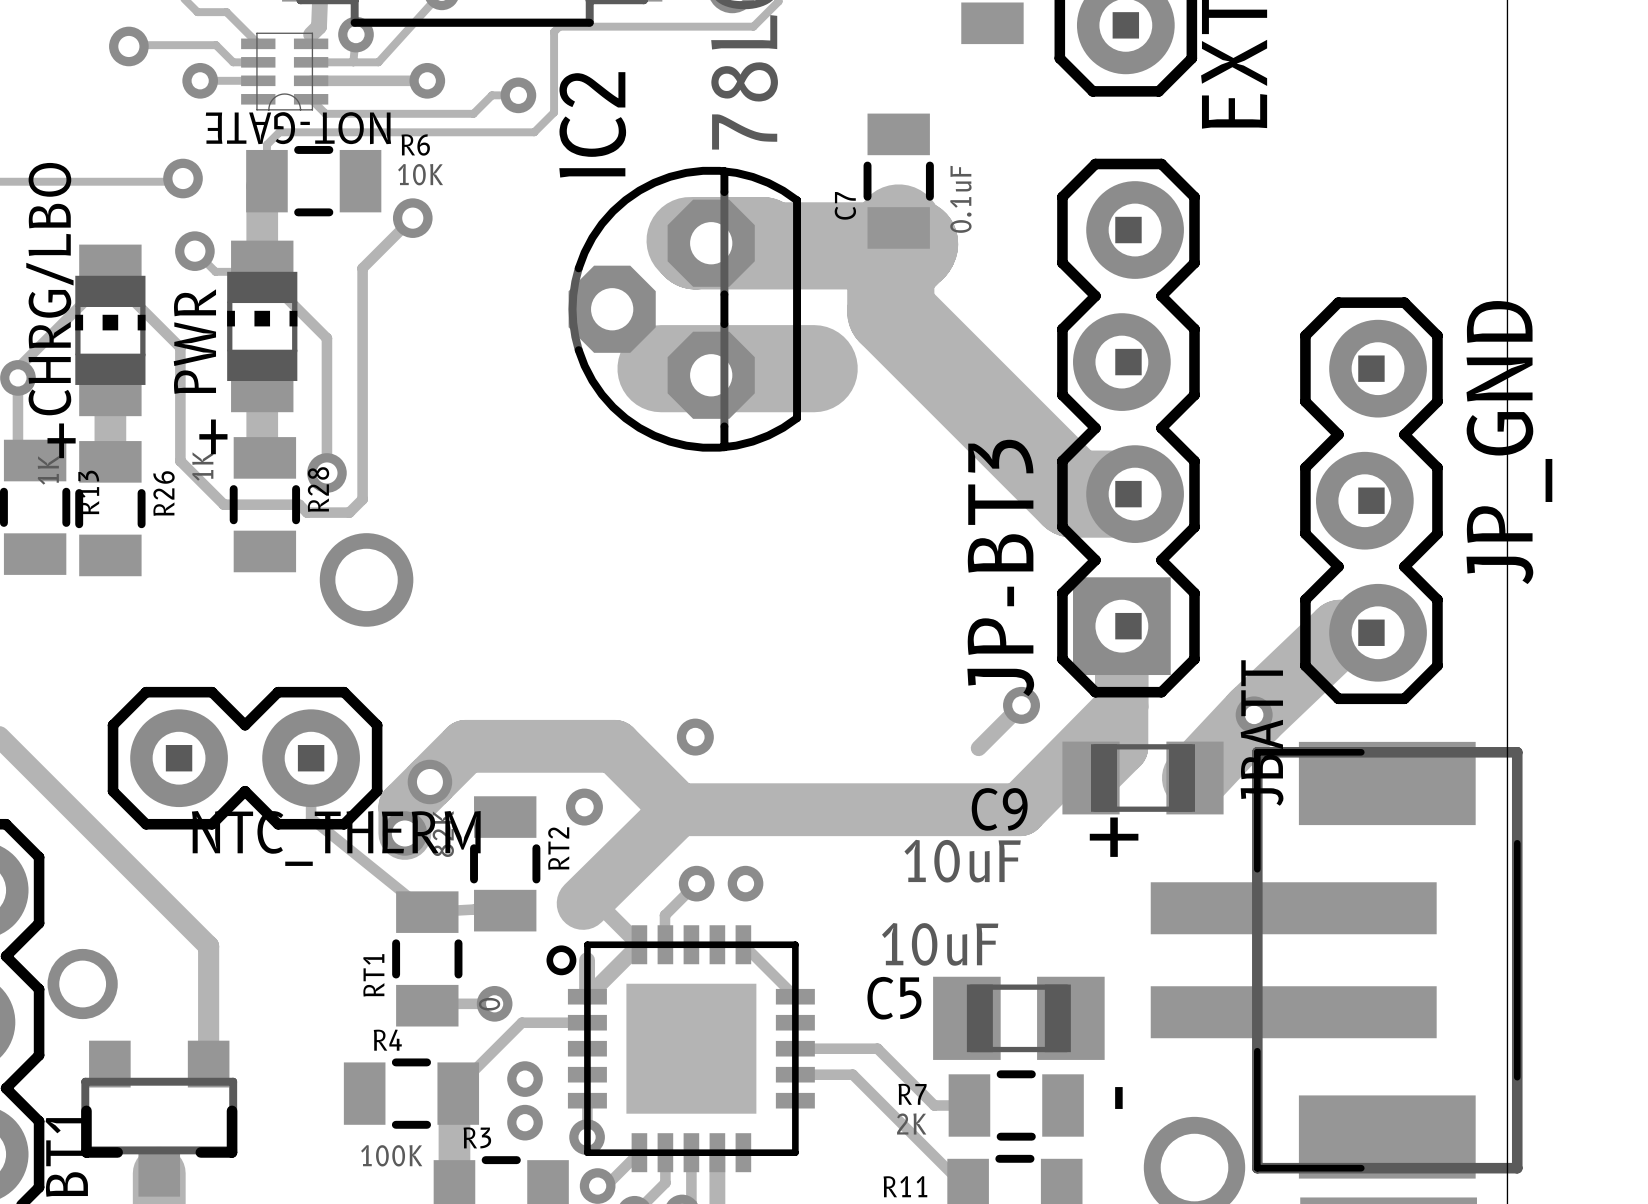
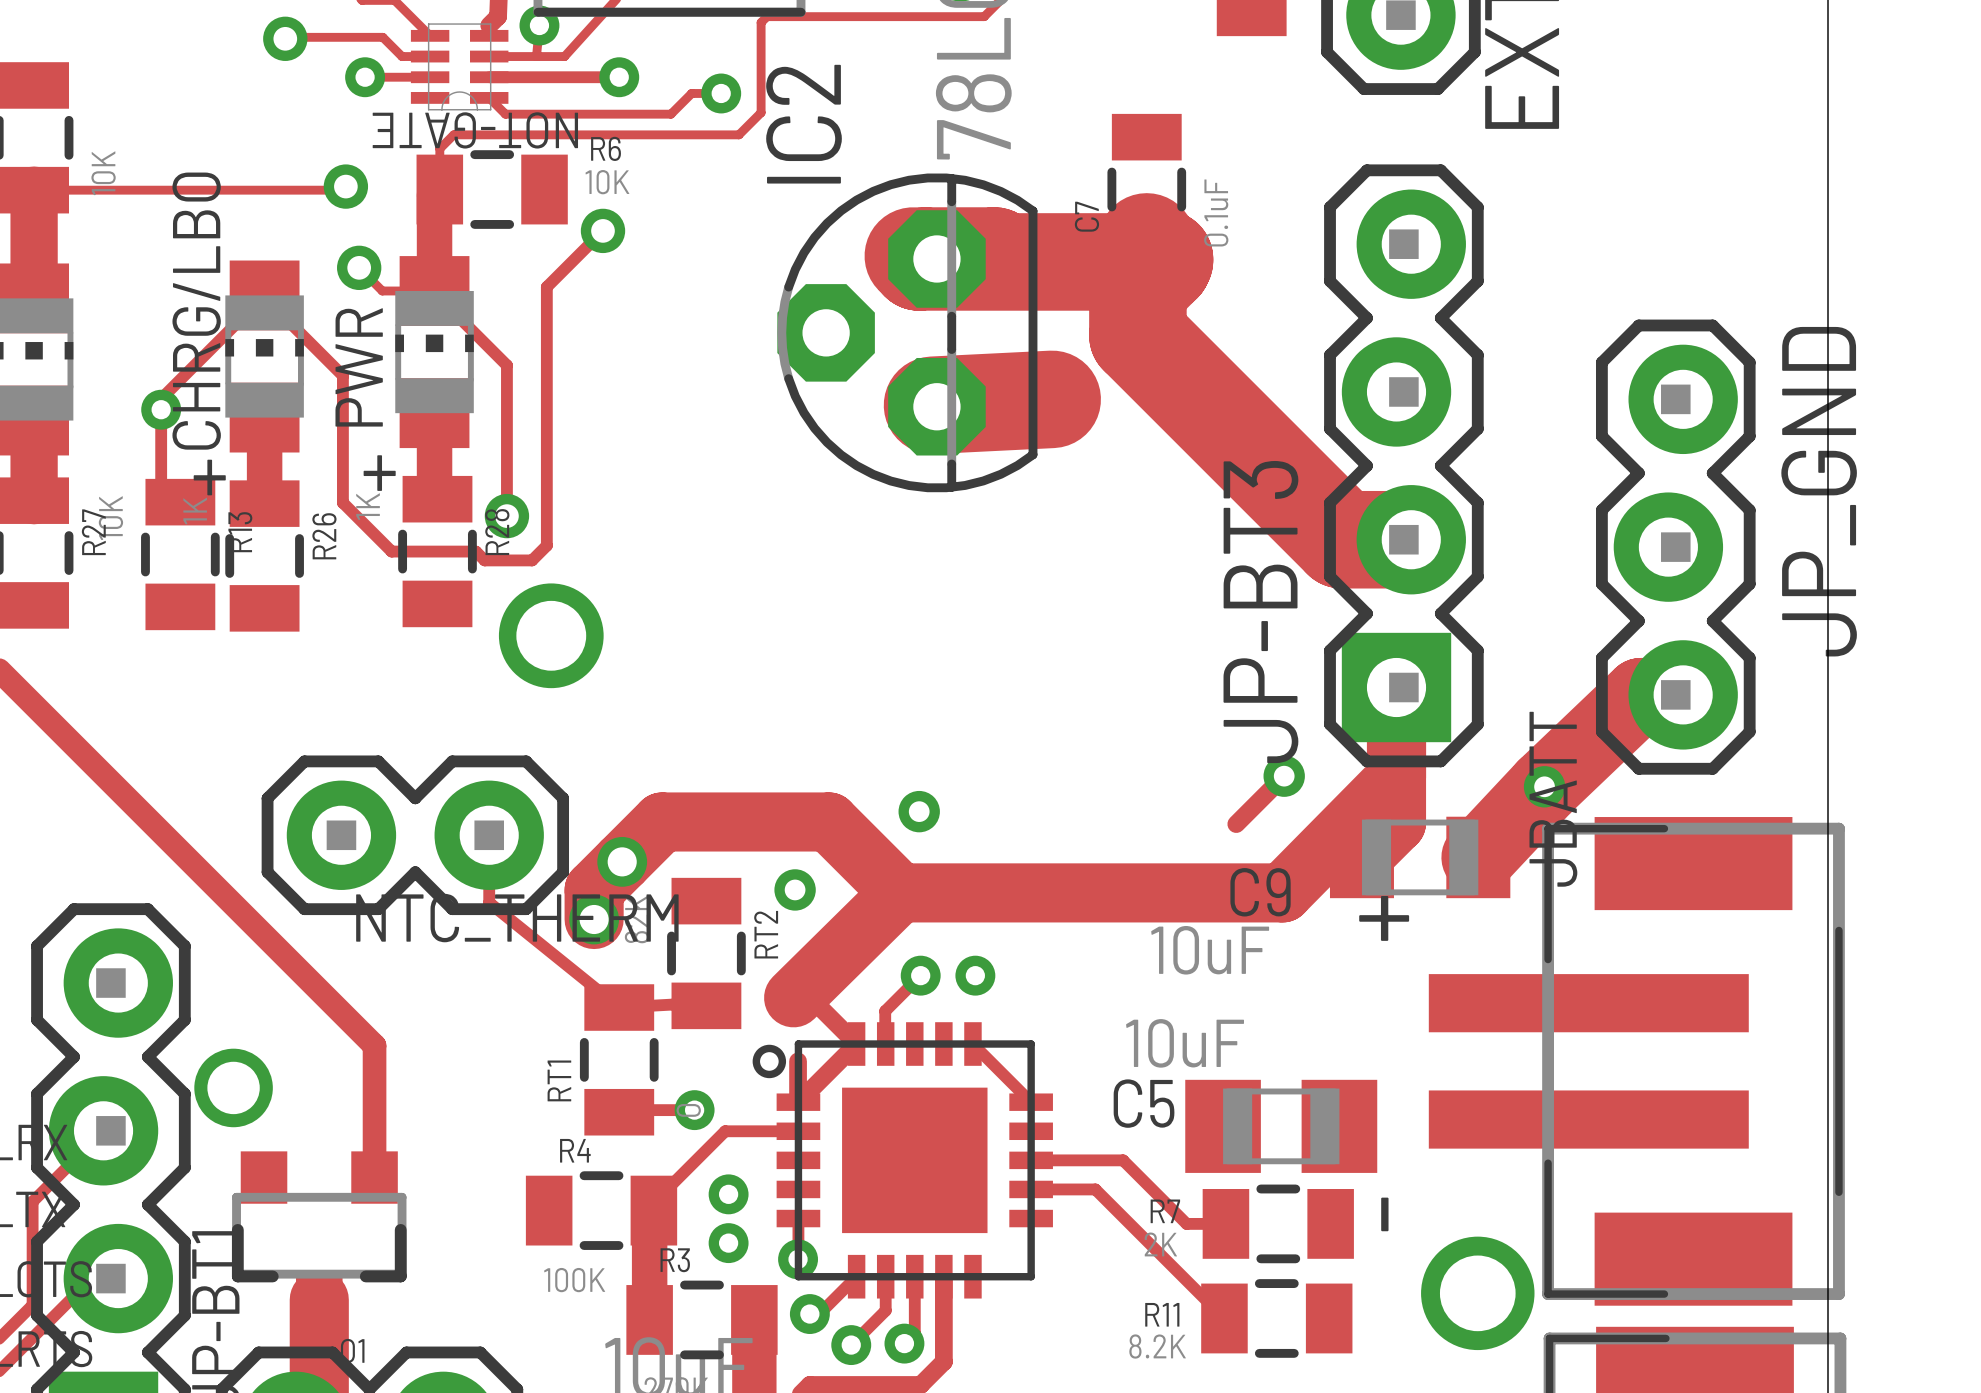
track: (661, 368) (814, 368) -> (932, 405) (1052, 399)

